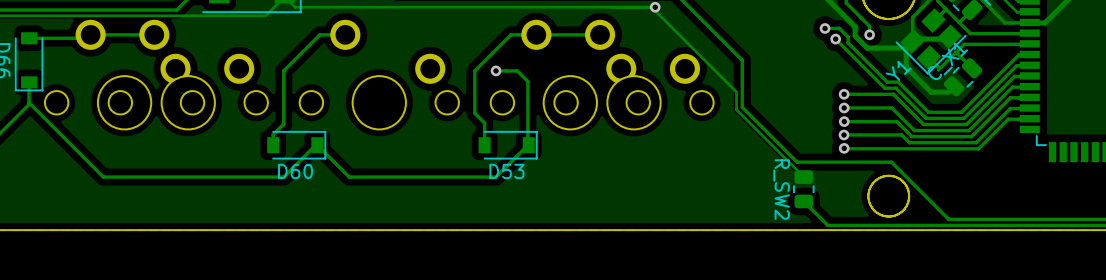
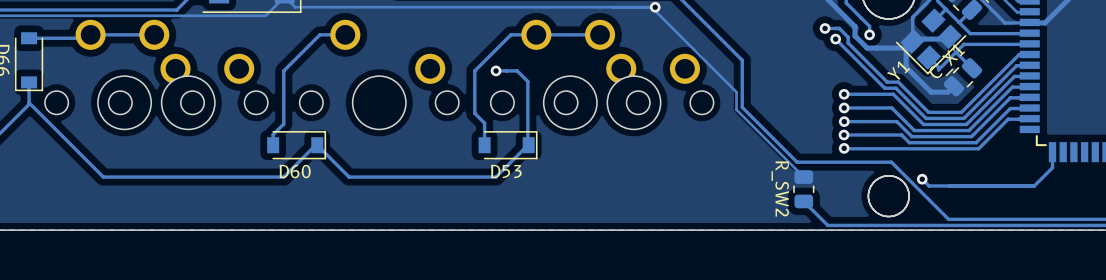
track: none -> (1052, 152) (1052, 167) (1034, 185) (928, 185) (922, 179)
via: none -> (922, 179)

